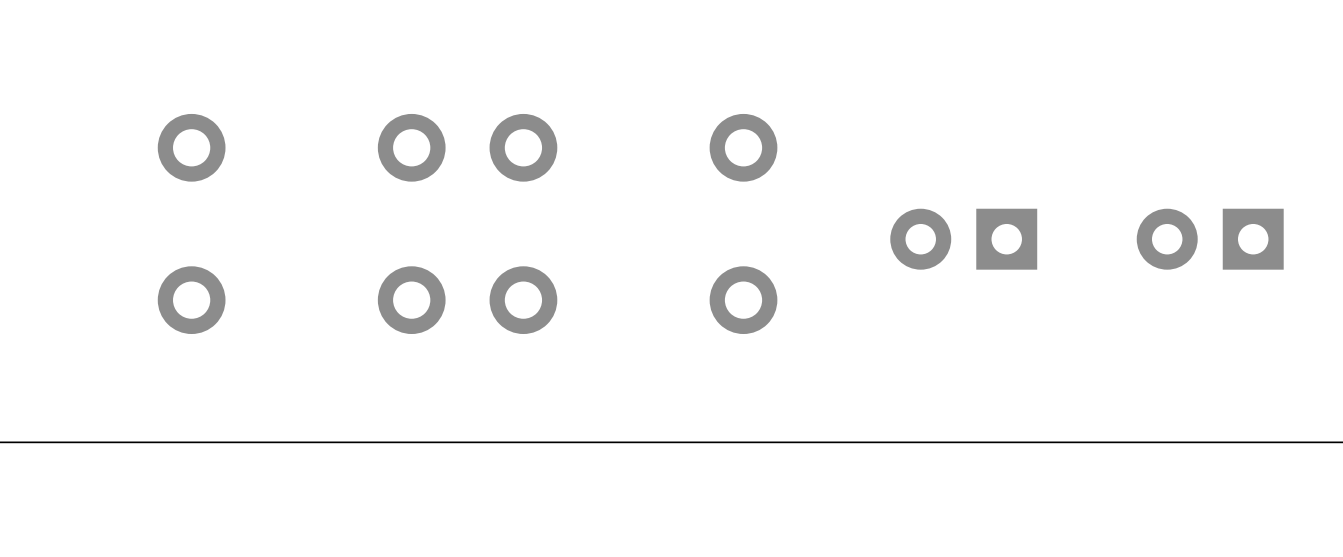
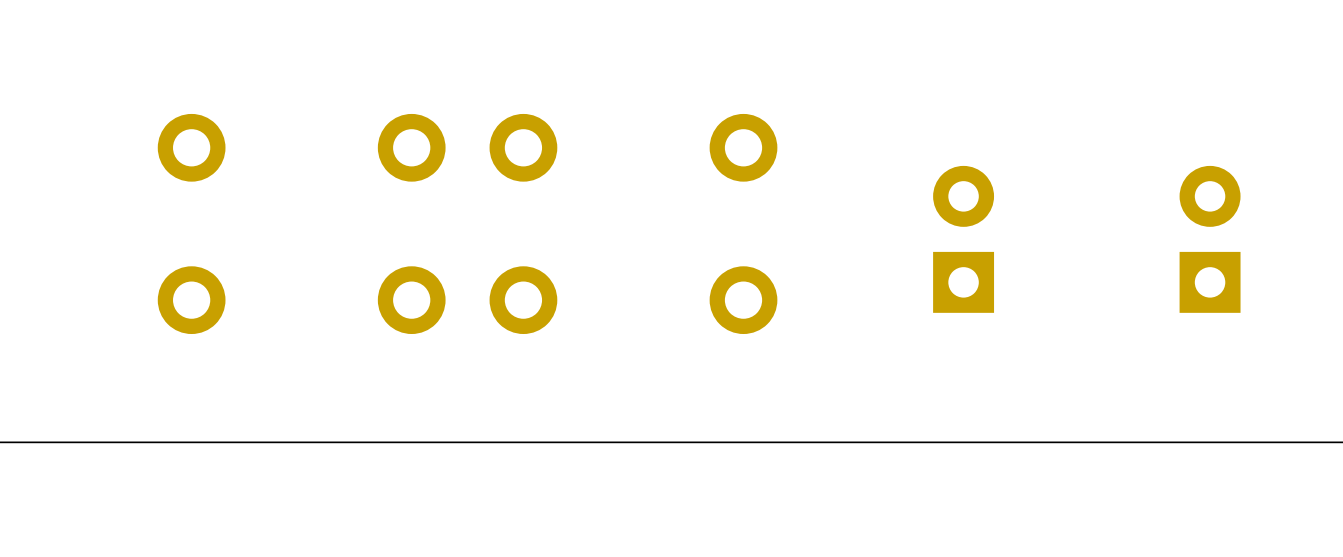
part rotation: 0° (963, 239) -> 90° clockwise (963, 239)
part rotation: 0° (1210, 239) -> 90° clockwise (1210, 239)

